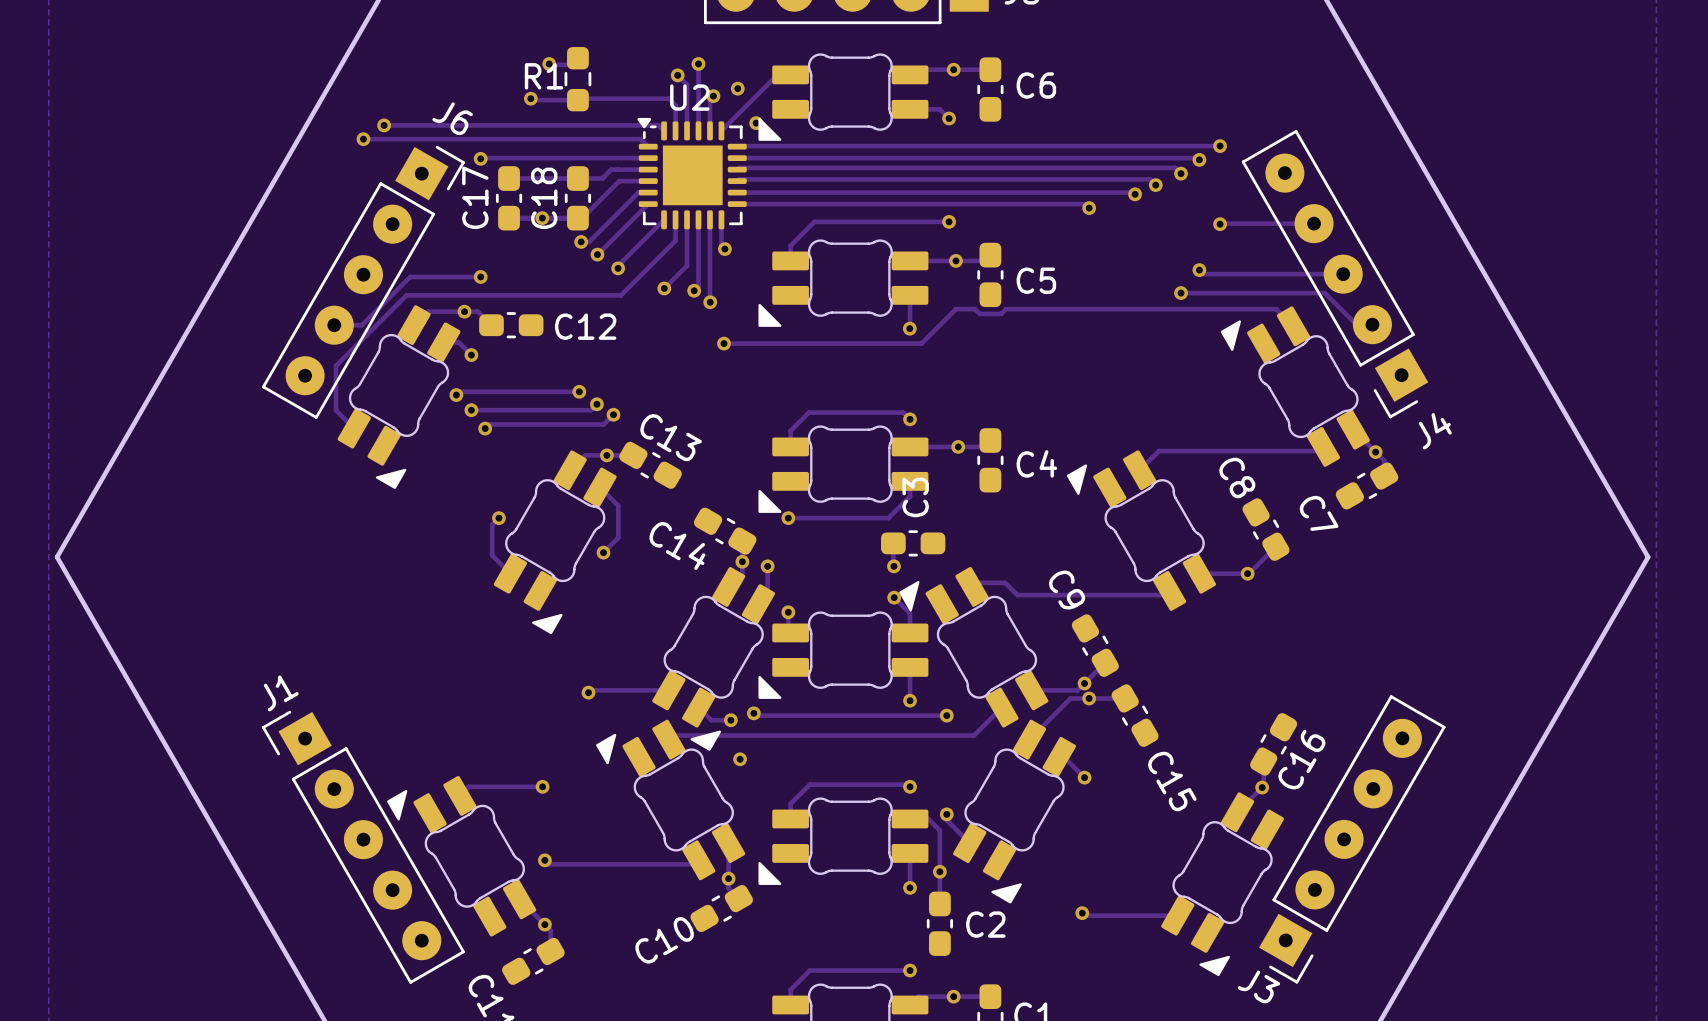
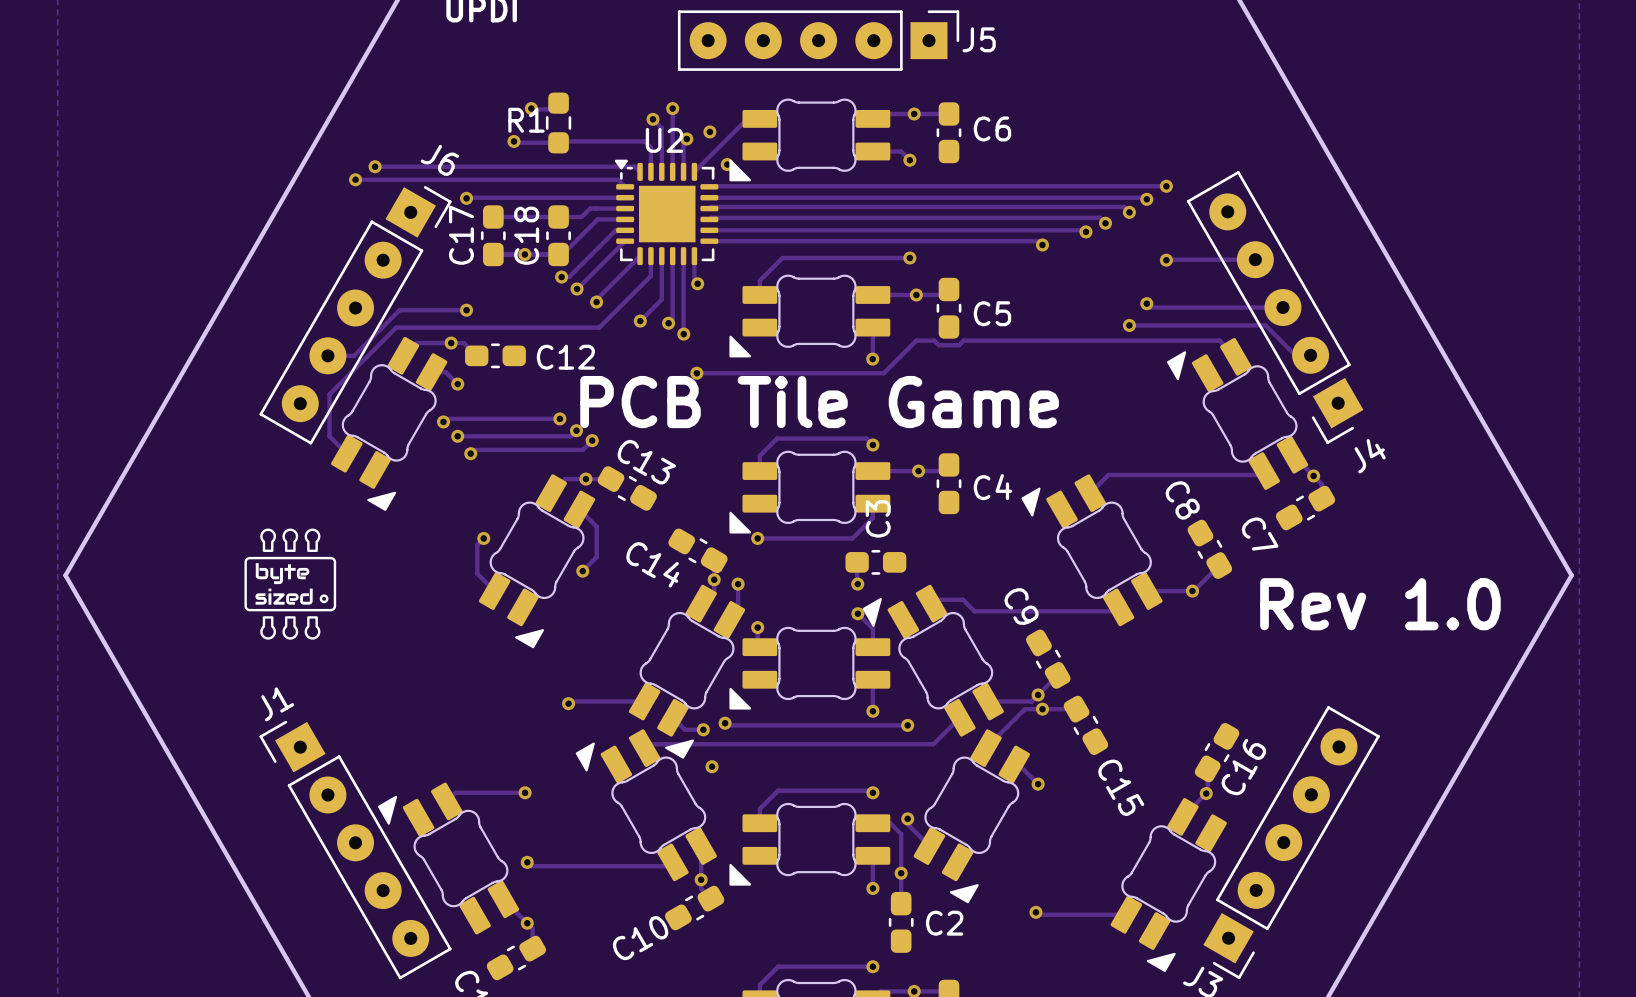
text: none -> PCB Tile Game (819, 402)
drawing: none -> [244, 528, 337, 640]
text: none -> Rev 1.0 (1380, 604)

